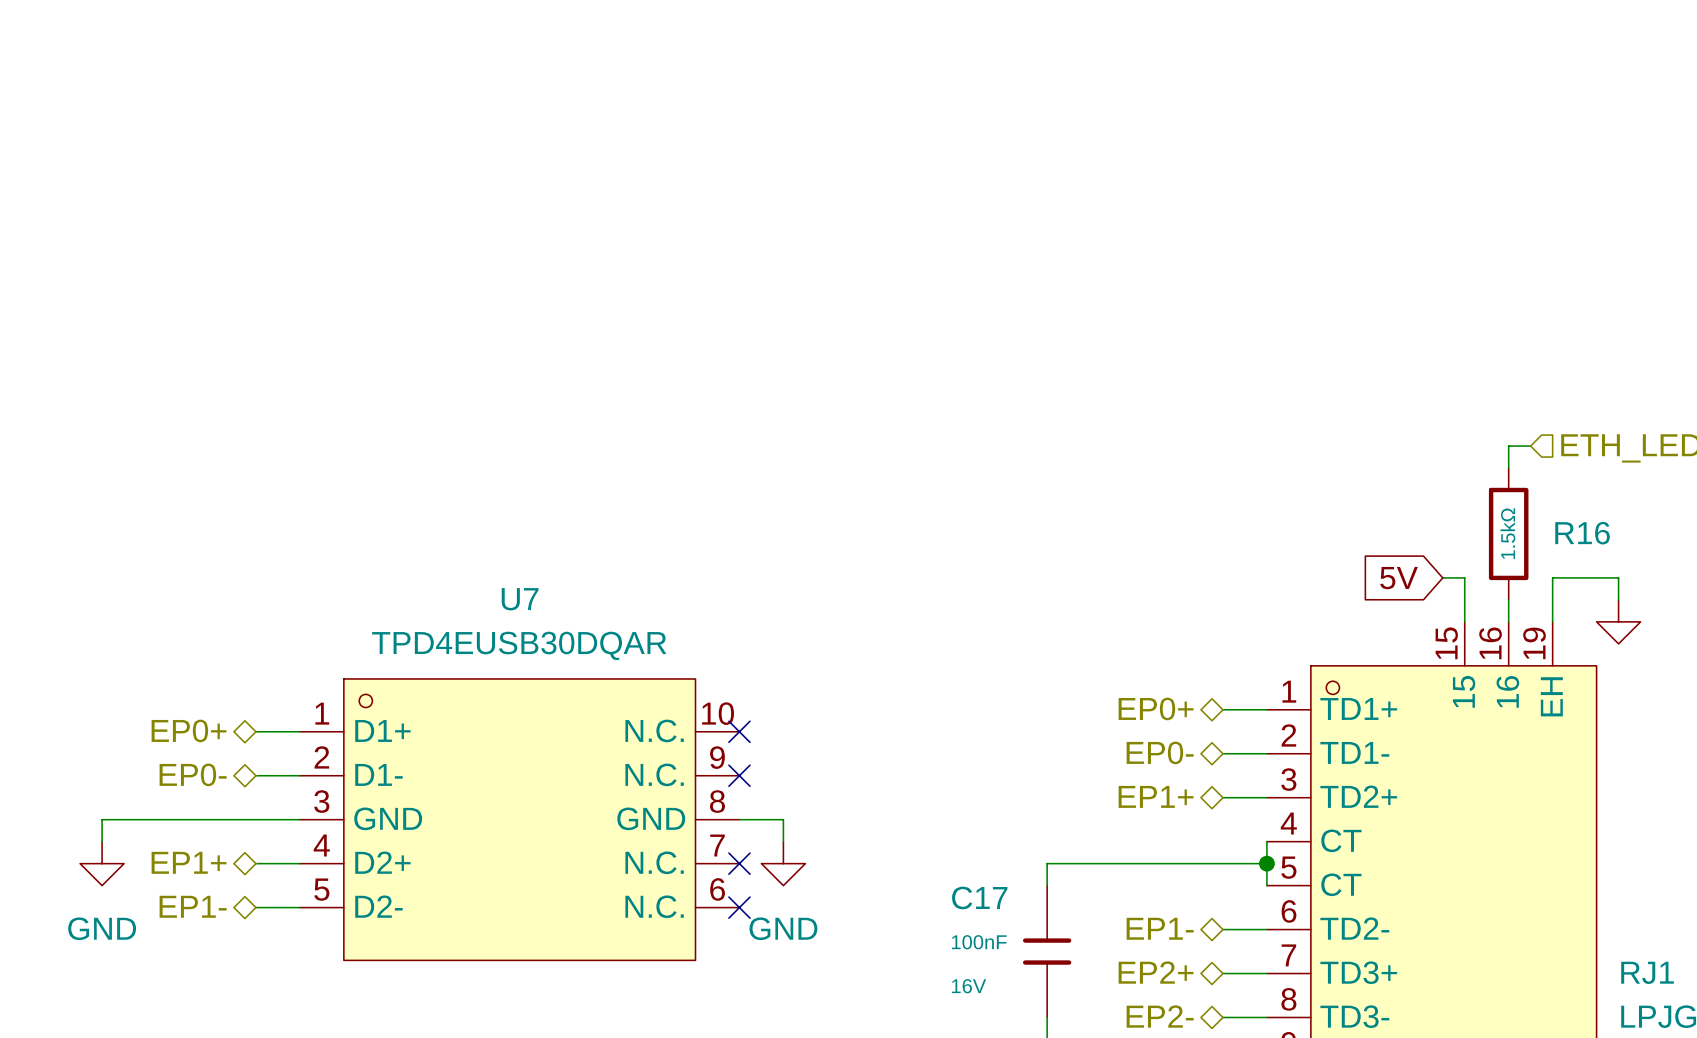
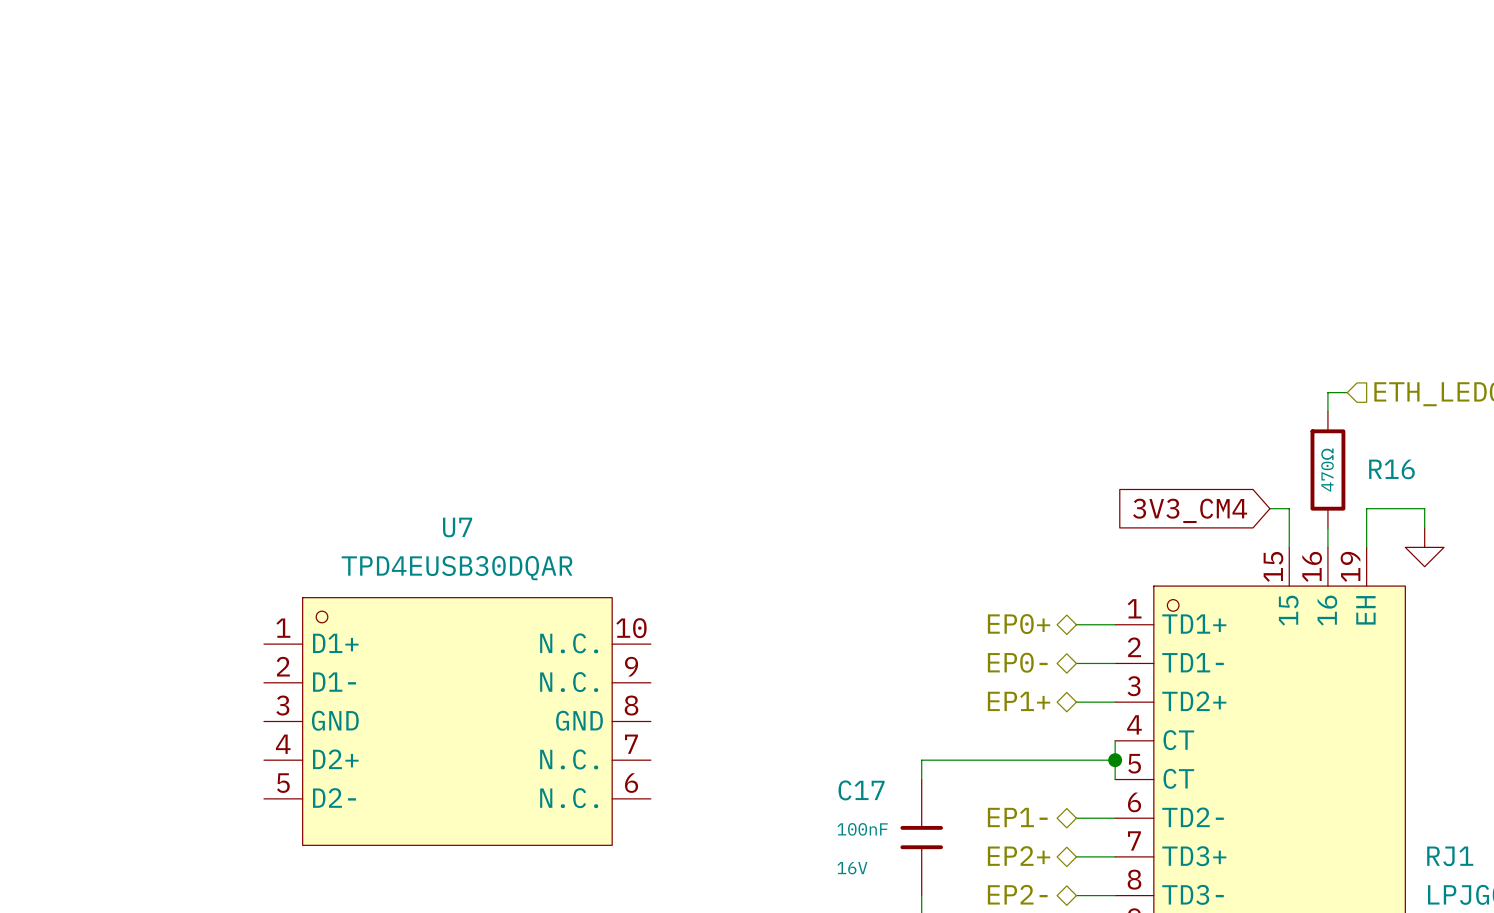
R16 value: 1.5kΩ (1507, 533) -> 470Ω (1327, 470)
global label: 5V (1399, 578) -> 3V3_CM4 (1190, 510)
hierarchical label: EP0+ (189, 730) -> none
wire: (255, 731) (299, 731) -> none
no-connect mark: (739, 731) -> none
hierarchical label: EP0- (193, 774) -> none
wire: (255, 775) (299, 775) -> none
no-connect mark: (739, 775) -> none
wire: (299, 819) (102, 819) (102, 841) -> none
wire: (739, 819) (783, 819) (783, 841) -> none
hierarchical label: EP1+ (189, 862) -> none
power symbol: GND (102, 863) -> none
wire: (255, 863) (299, 863) -> none
no-connect mark: (739, 863) -> none
power symbol: GND (783, 863) -> none
hierarchical label: EP1- (193, 906) -> none
wire: (255, 907) (299, 907) -> none
no-connect mark: (739, 907) -> none

